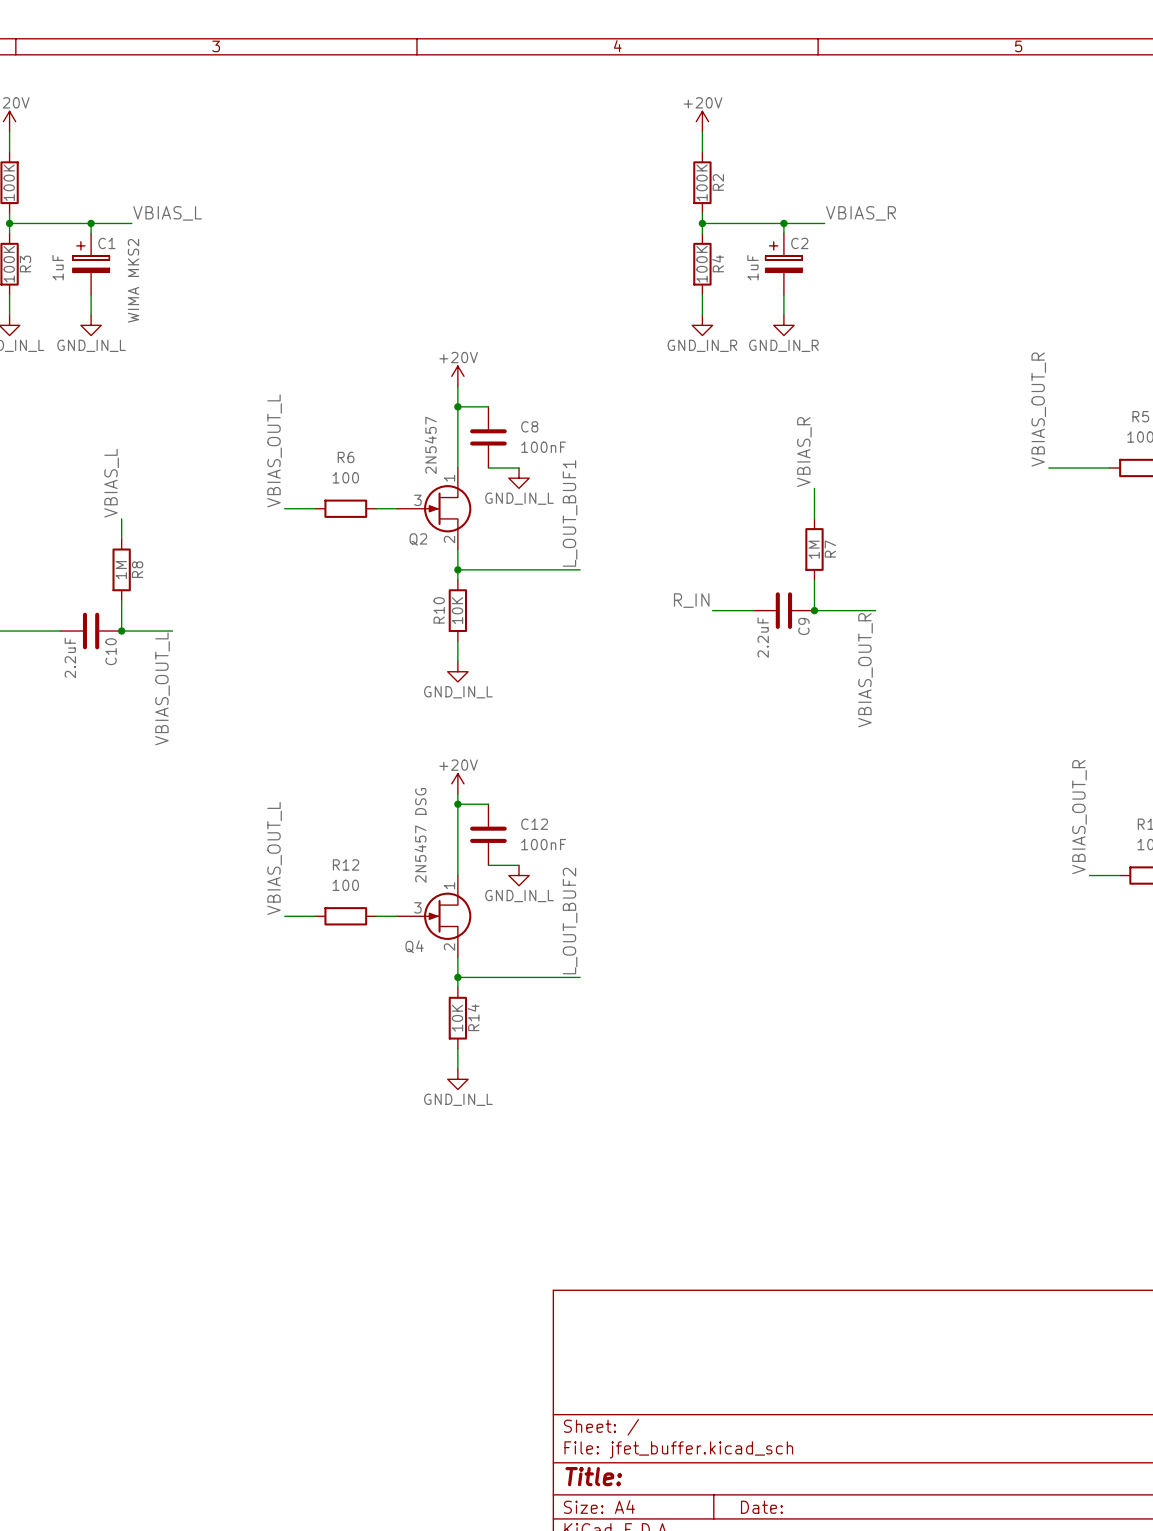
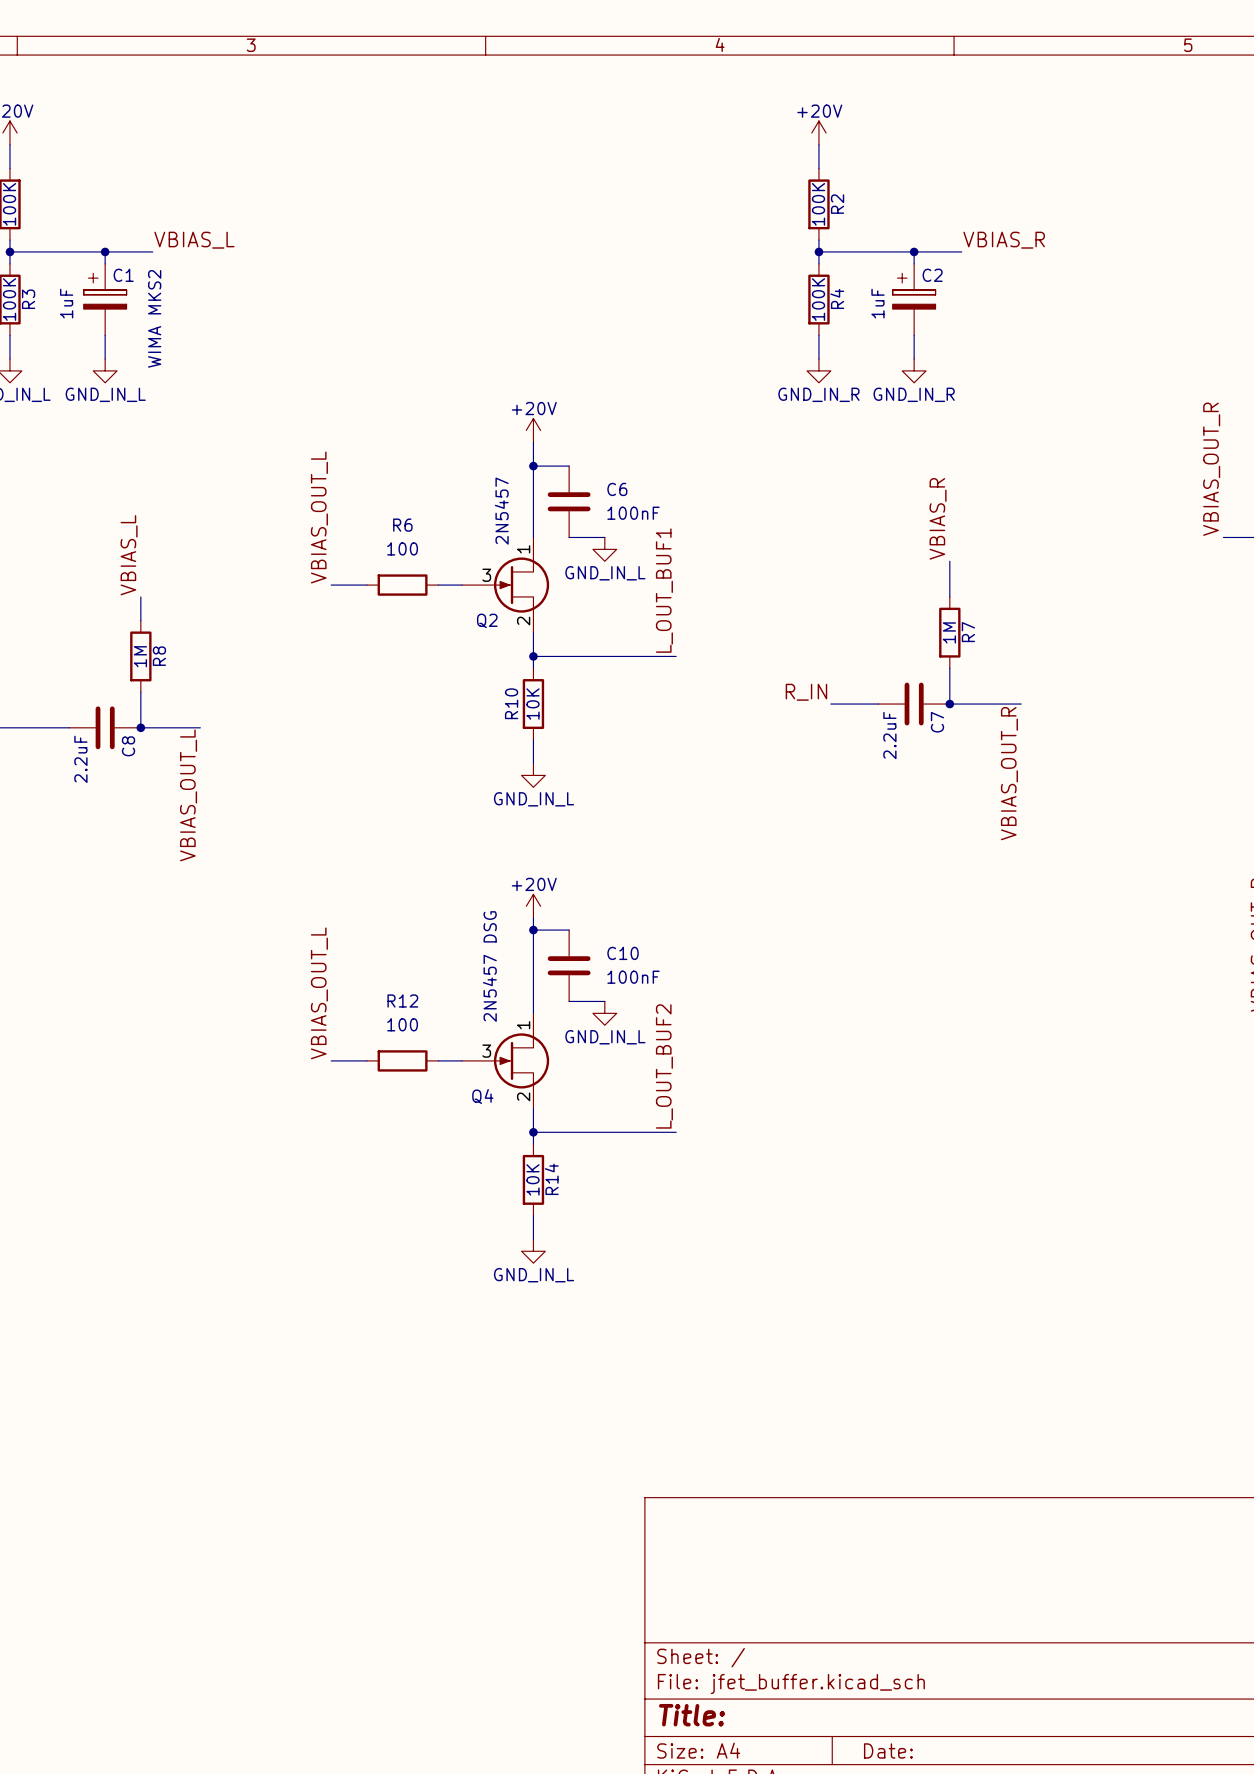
C8 name: C8 (529, 426) -> C6 (617, 489)
C9 name: C9 (803, 626) -> C7 (937, 722)
C10 name: C10 (111, 651) -> C8 (128, 746)
C12 name: C12 (534, 824) -> C10 (623, 953)

